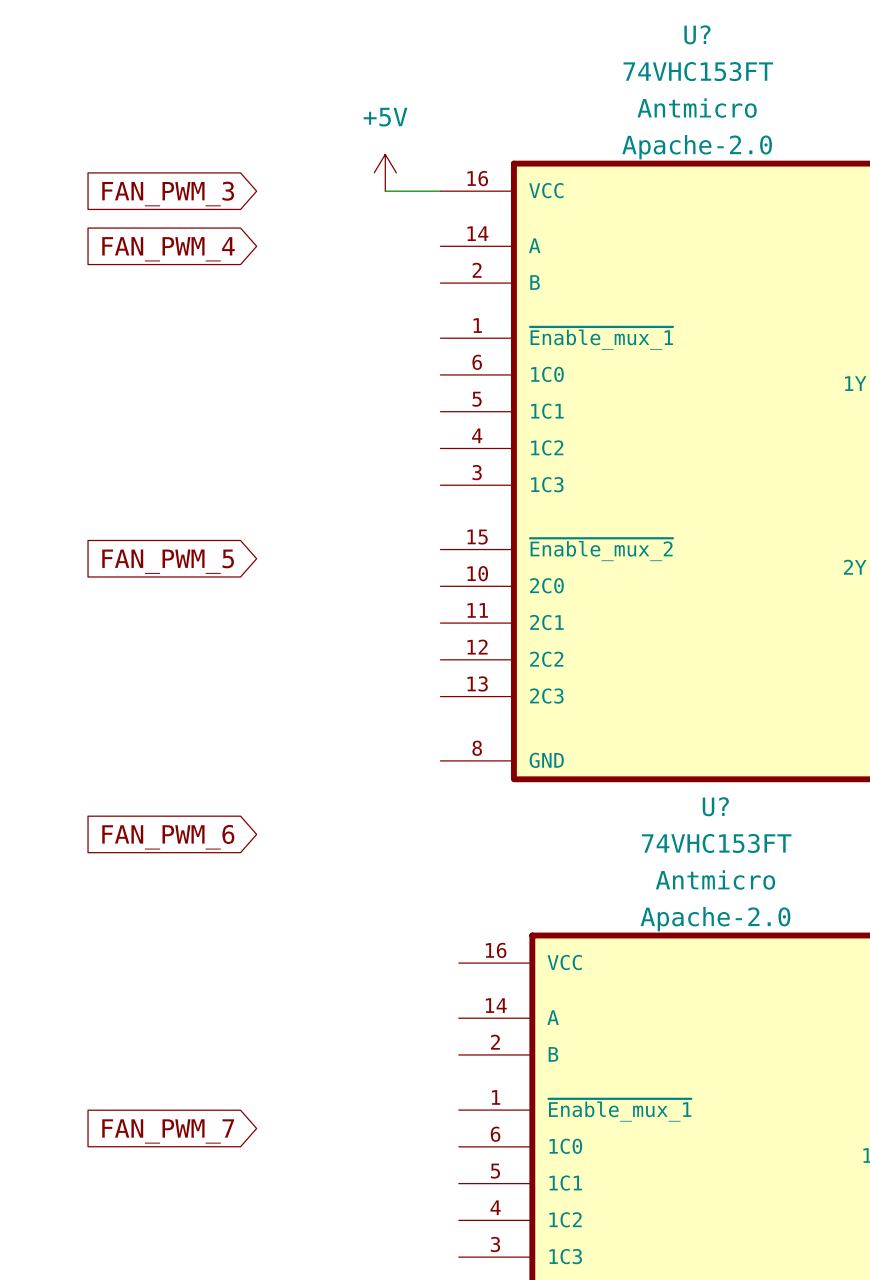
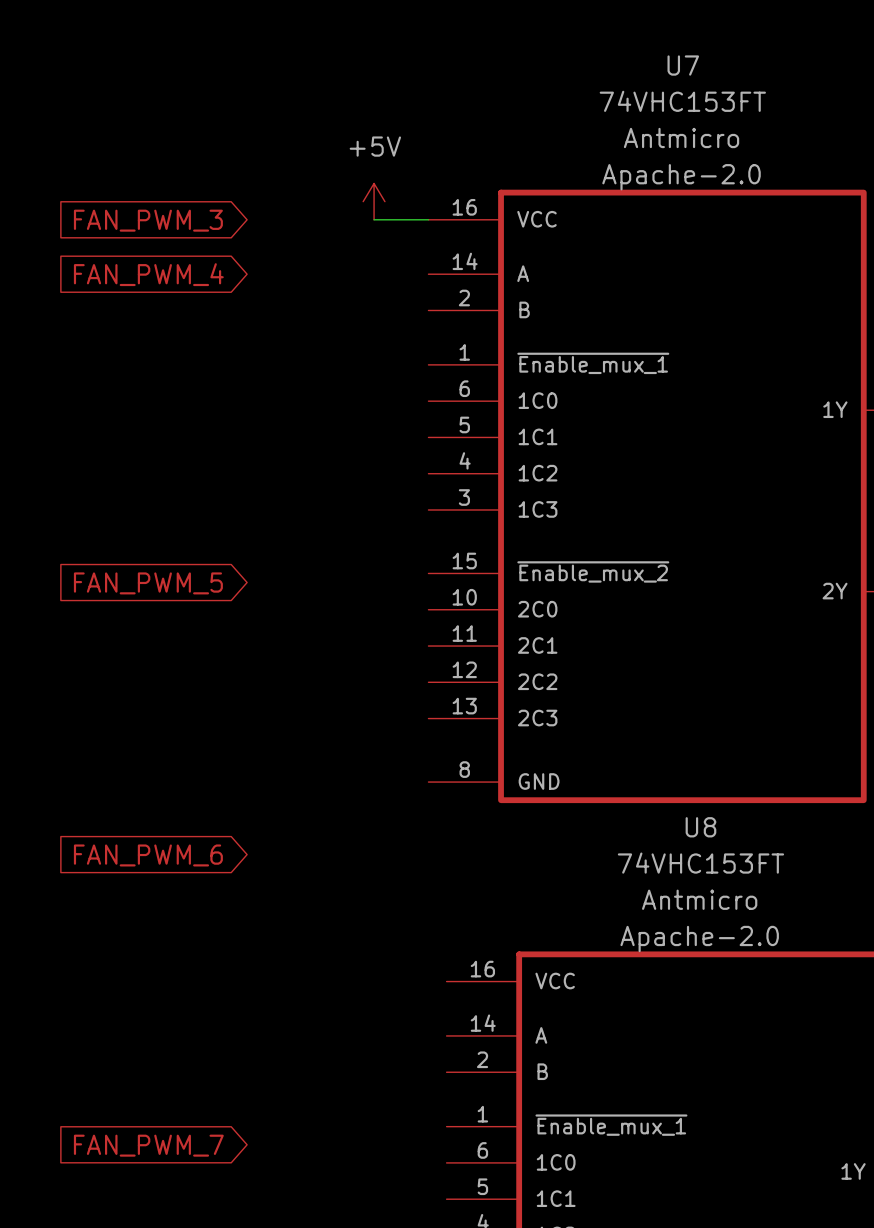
U? name: U? (697, 34) -> U7 (683, 65)
U? name: U? (715, 806) -> U8 (700, 827)

